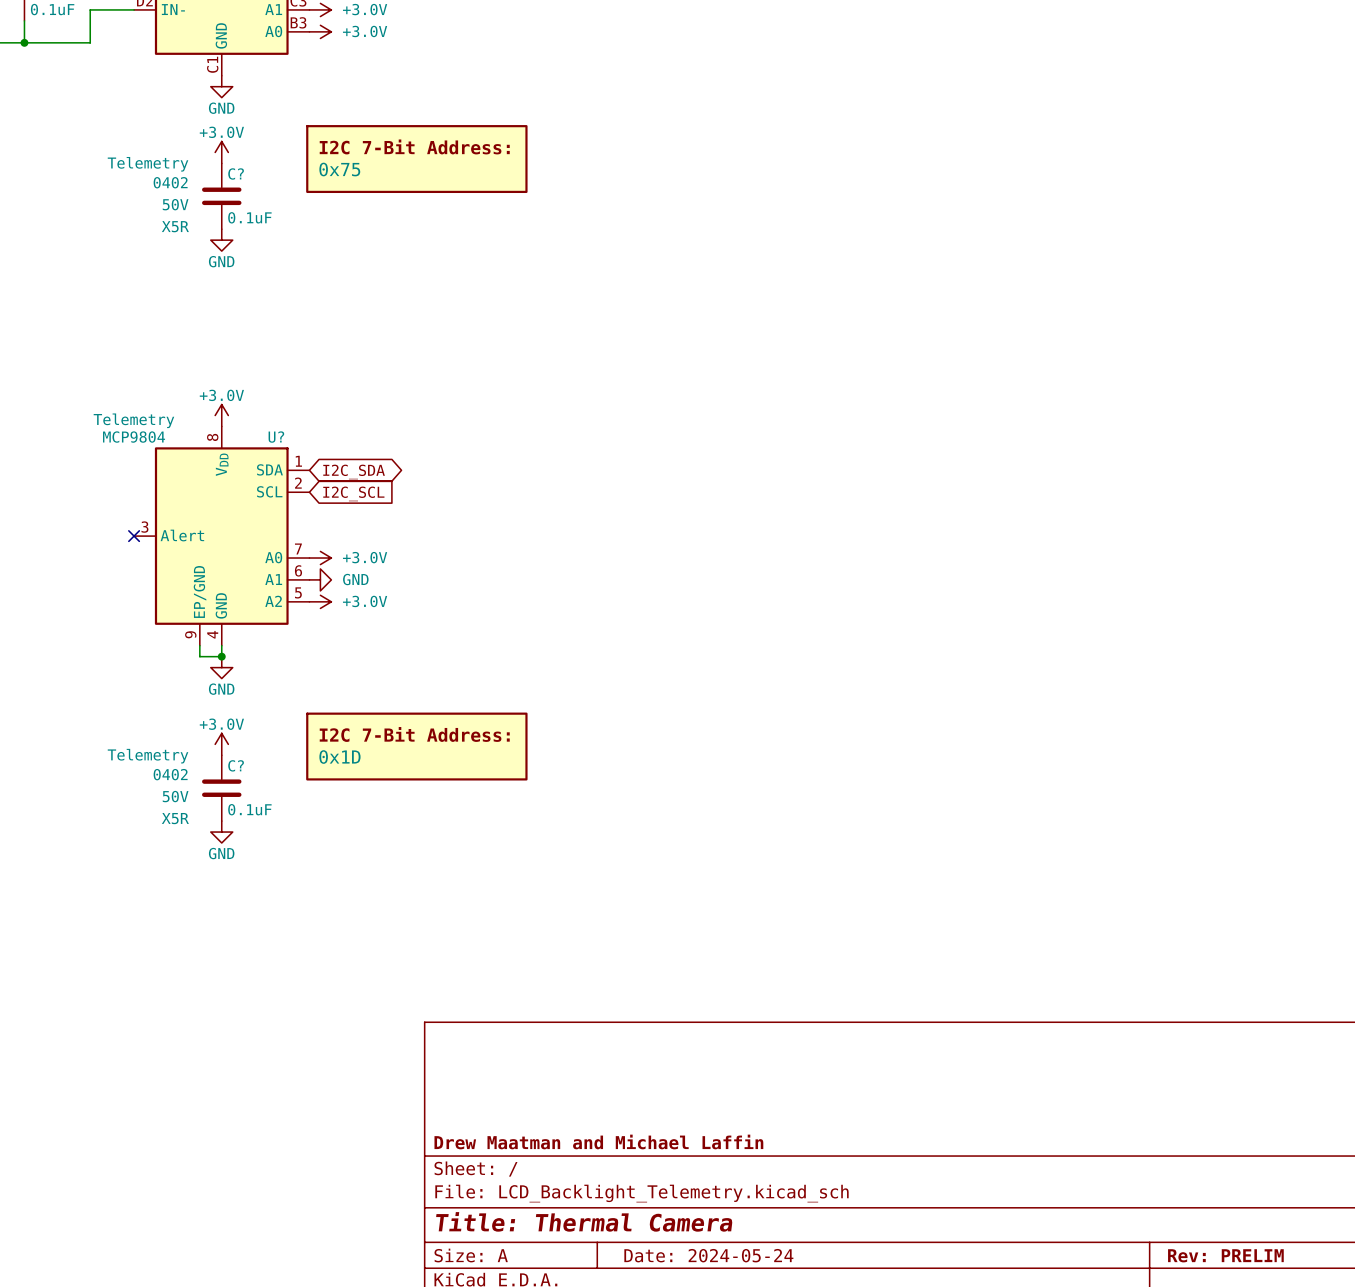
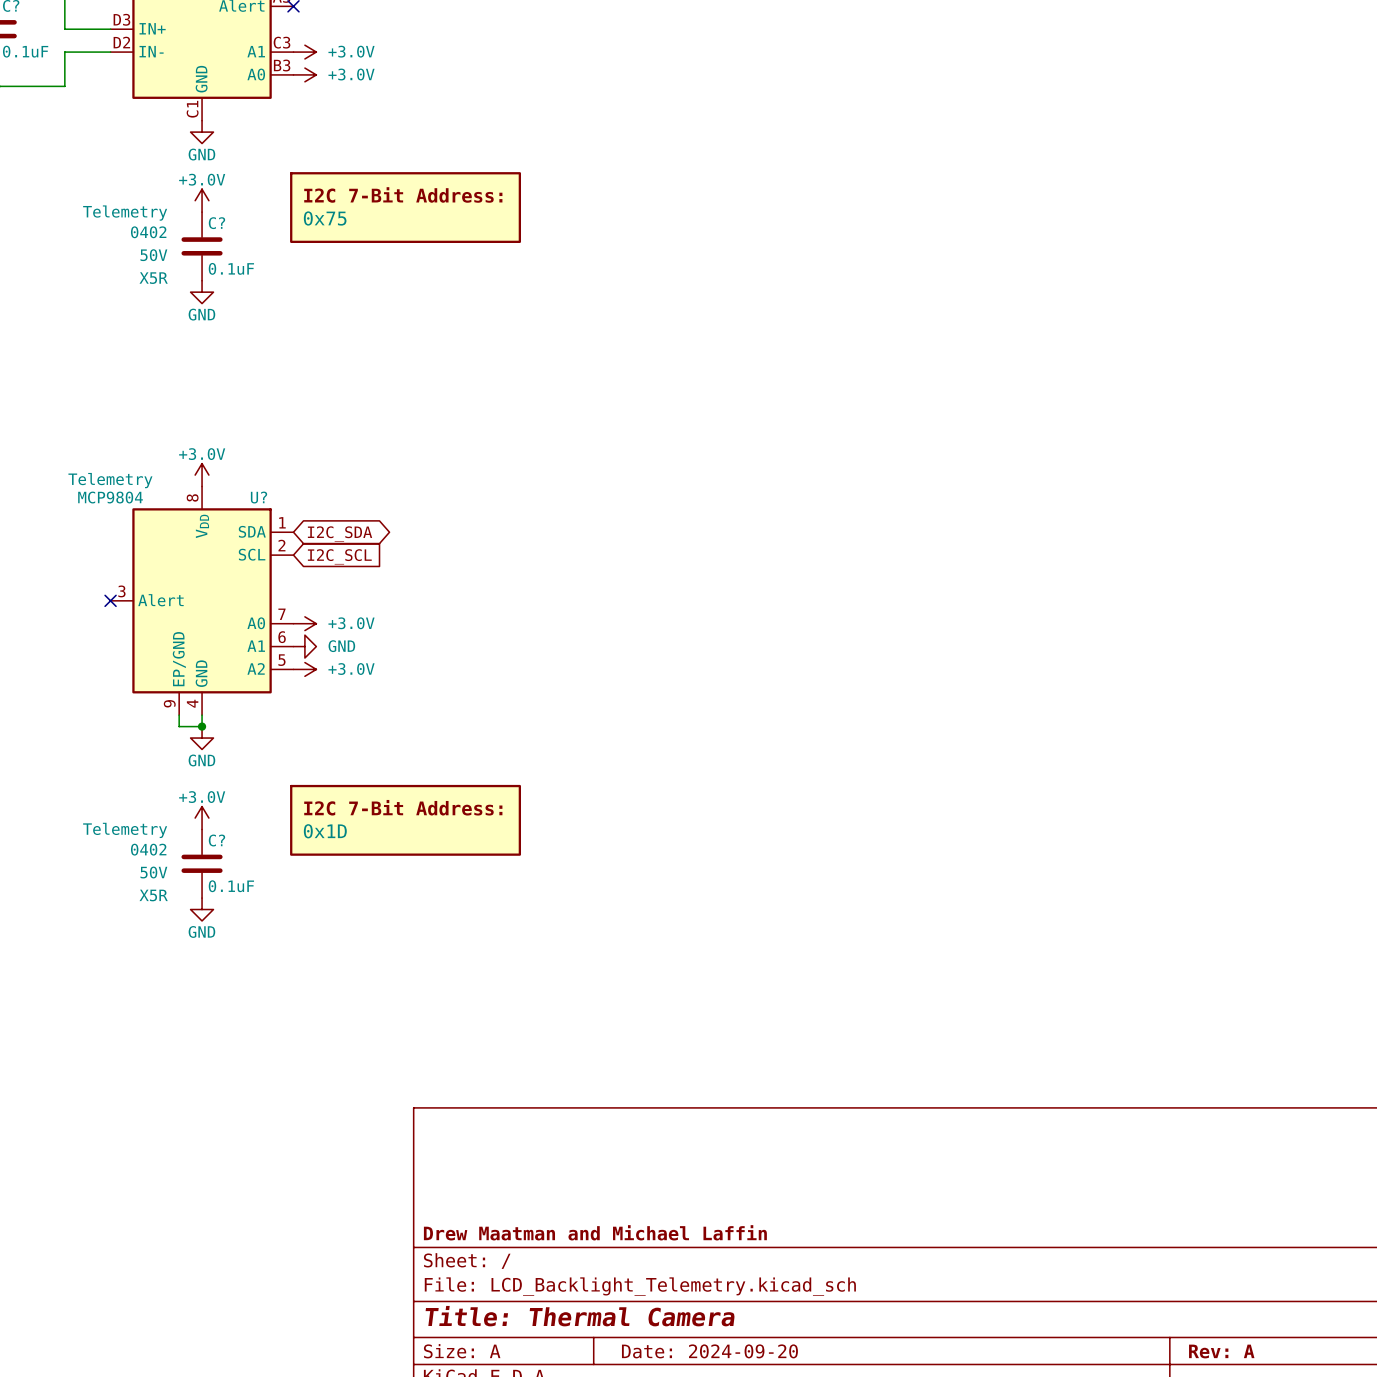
title block: Date: 2024-05-24 (708, 1255) -> Date: 2024-09-20 (709, 1351)
title block: Rev: PRELIM (1225, 1255) -> Rev: A (1221, 1351)

